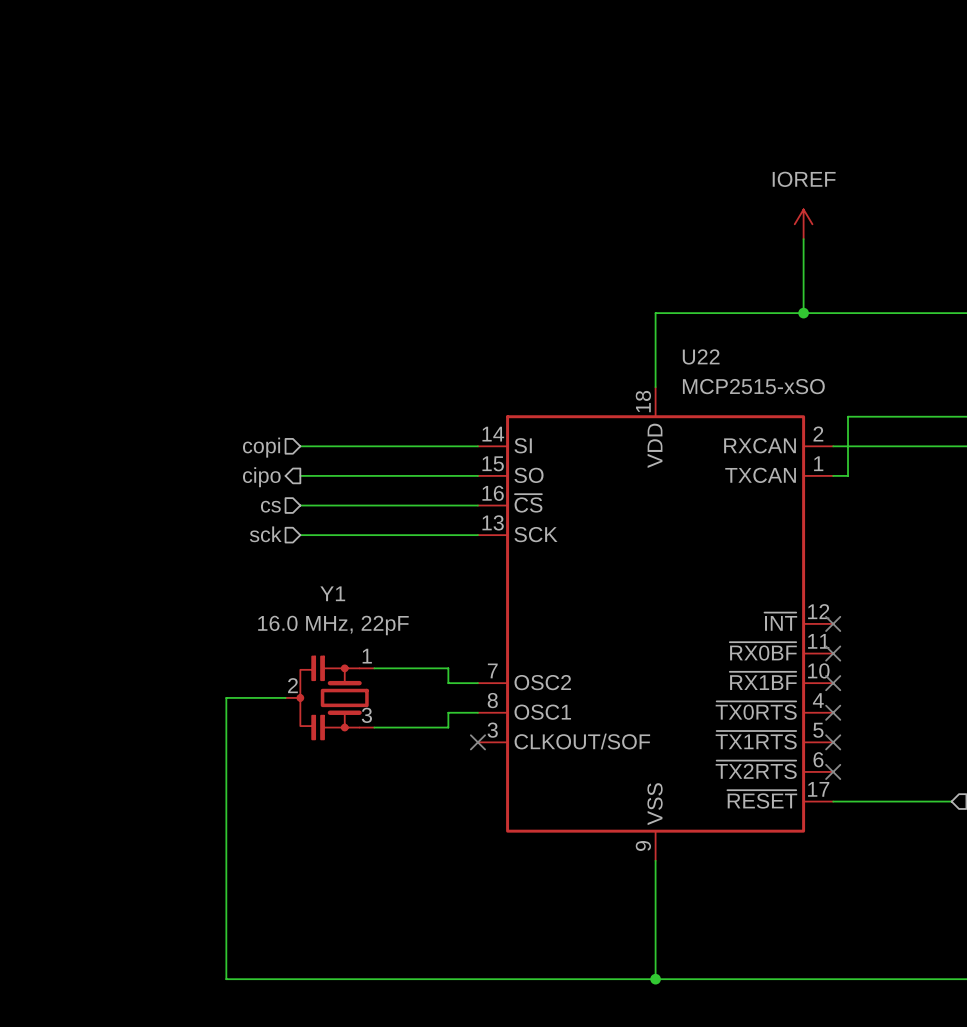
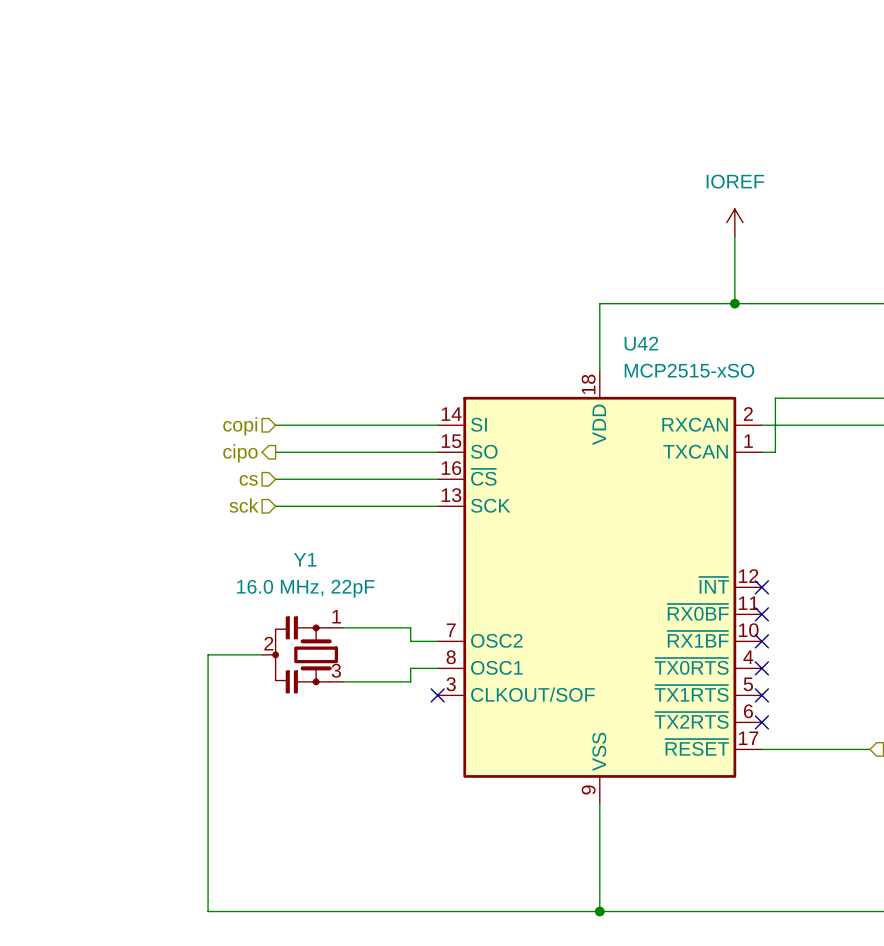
U22 name: U22 (701, 356) -> U42 (641, 343)

